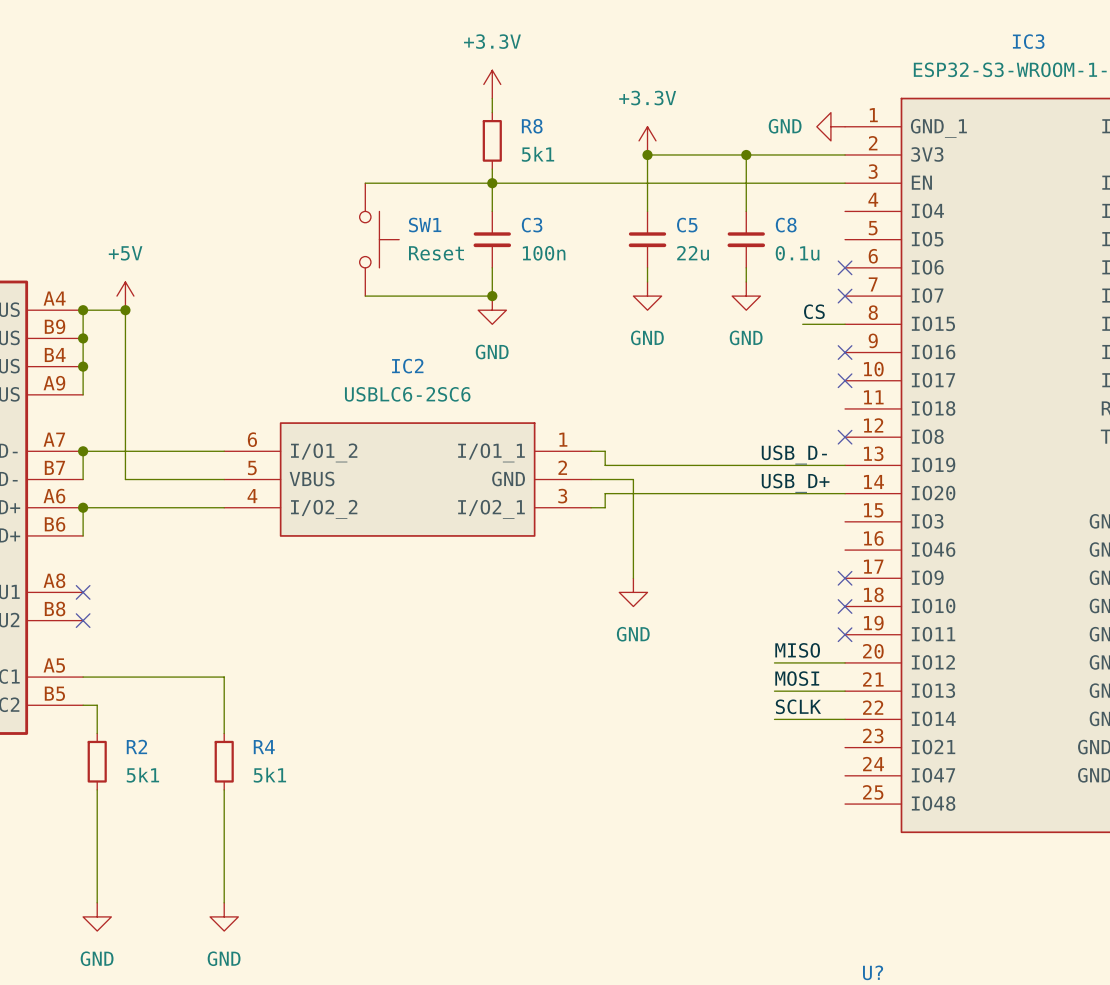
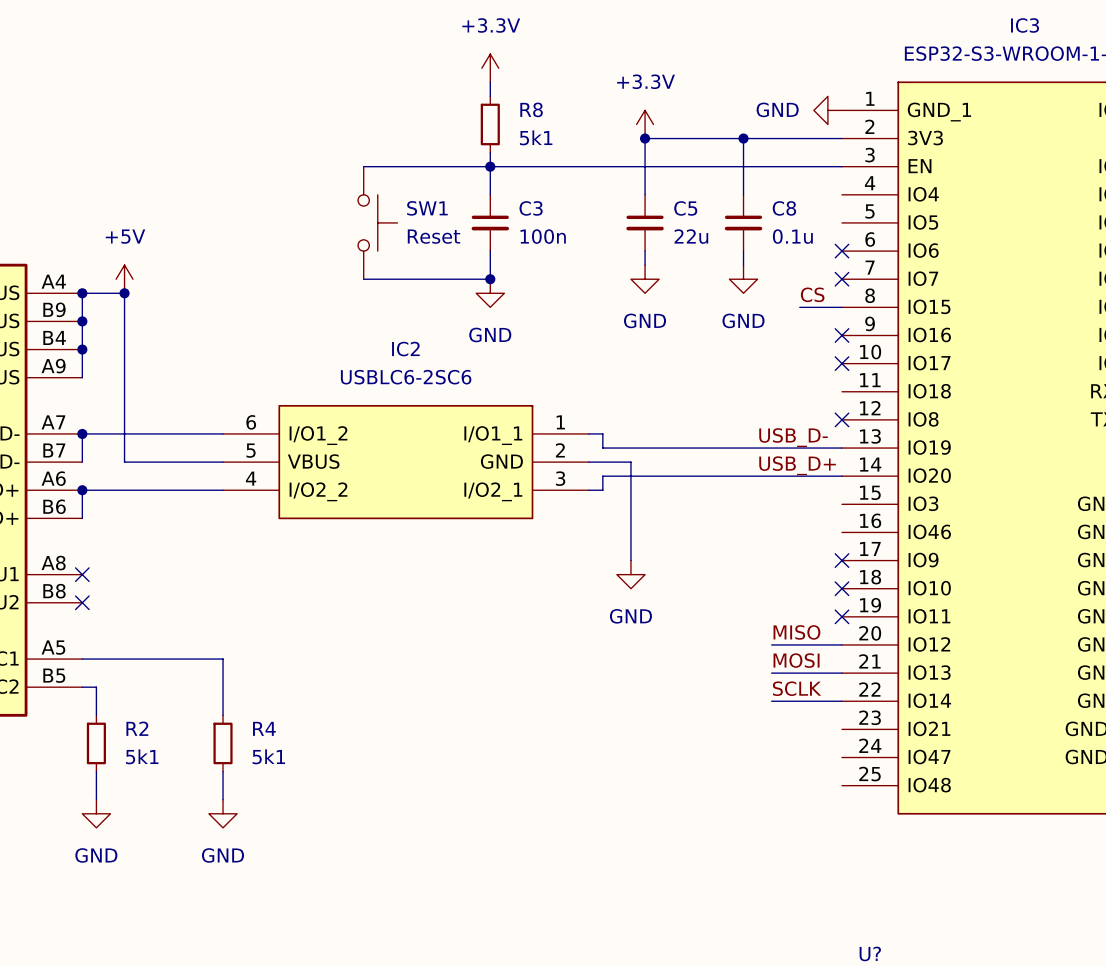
wire: (97, 818) (97, 902) -> none
wire: (224, 818) (224, 902) -> none
power symbol: none -> GND (96, 813)
power symbol: none -> GND (223, 813)
power symbol: GND (97, 916) -> none
power symbol: GND (224, 916) -> none

